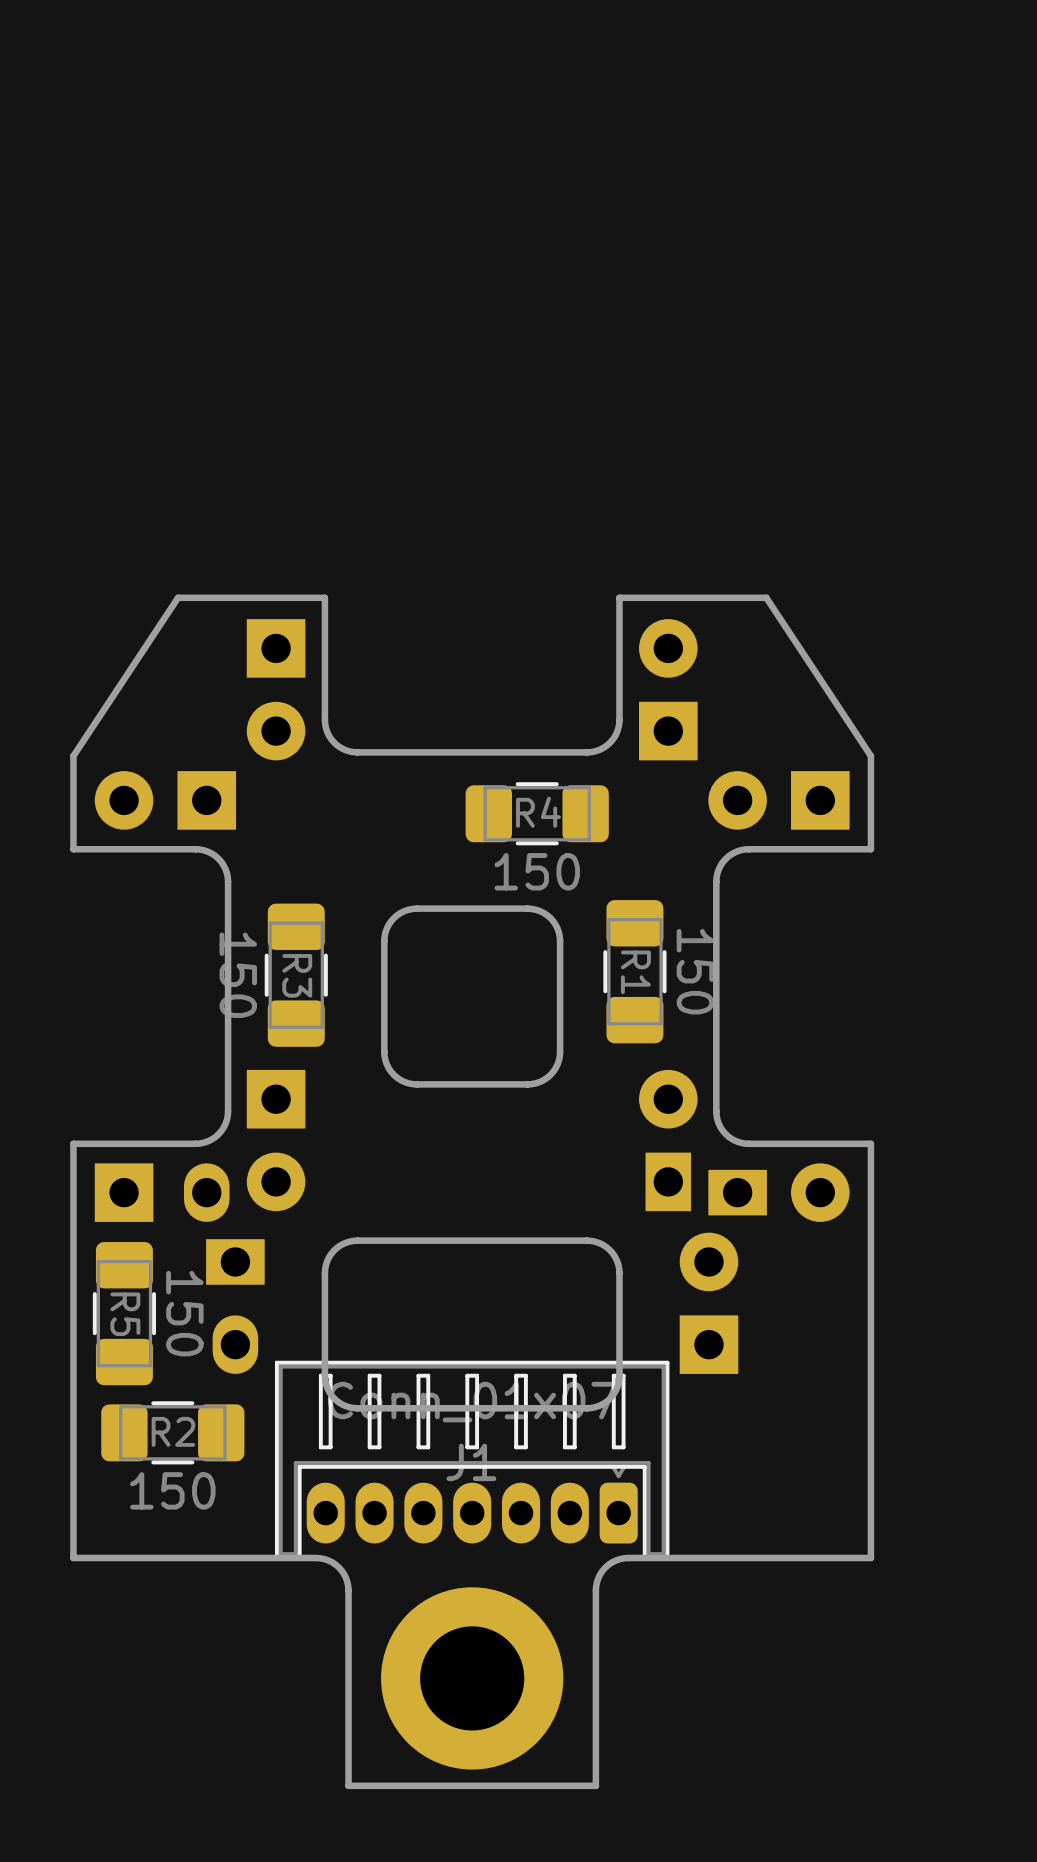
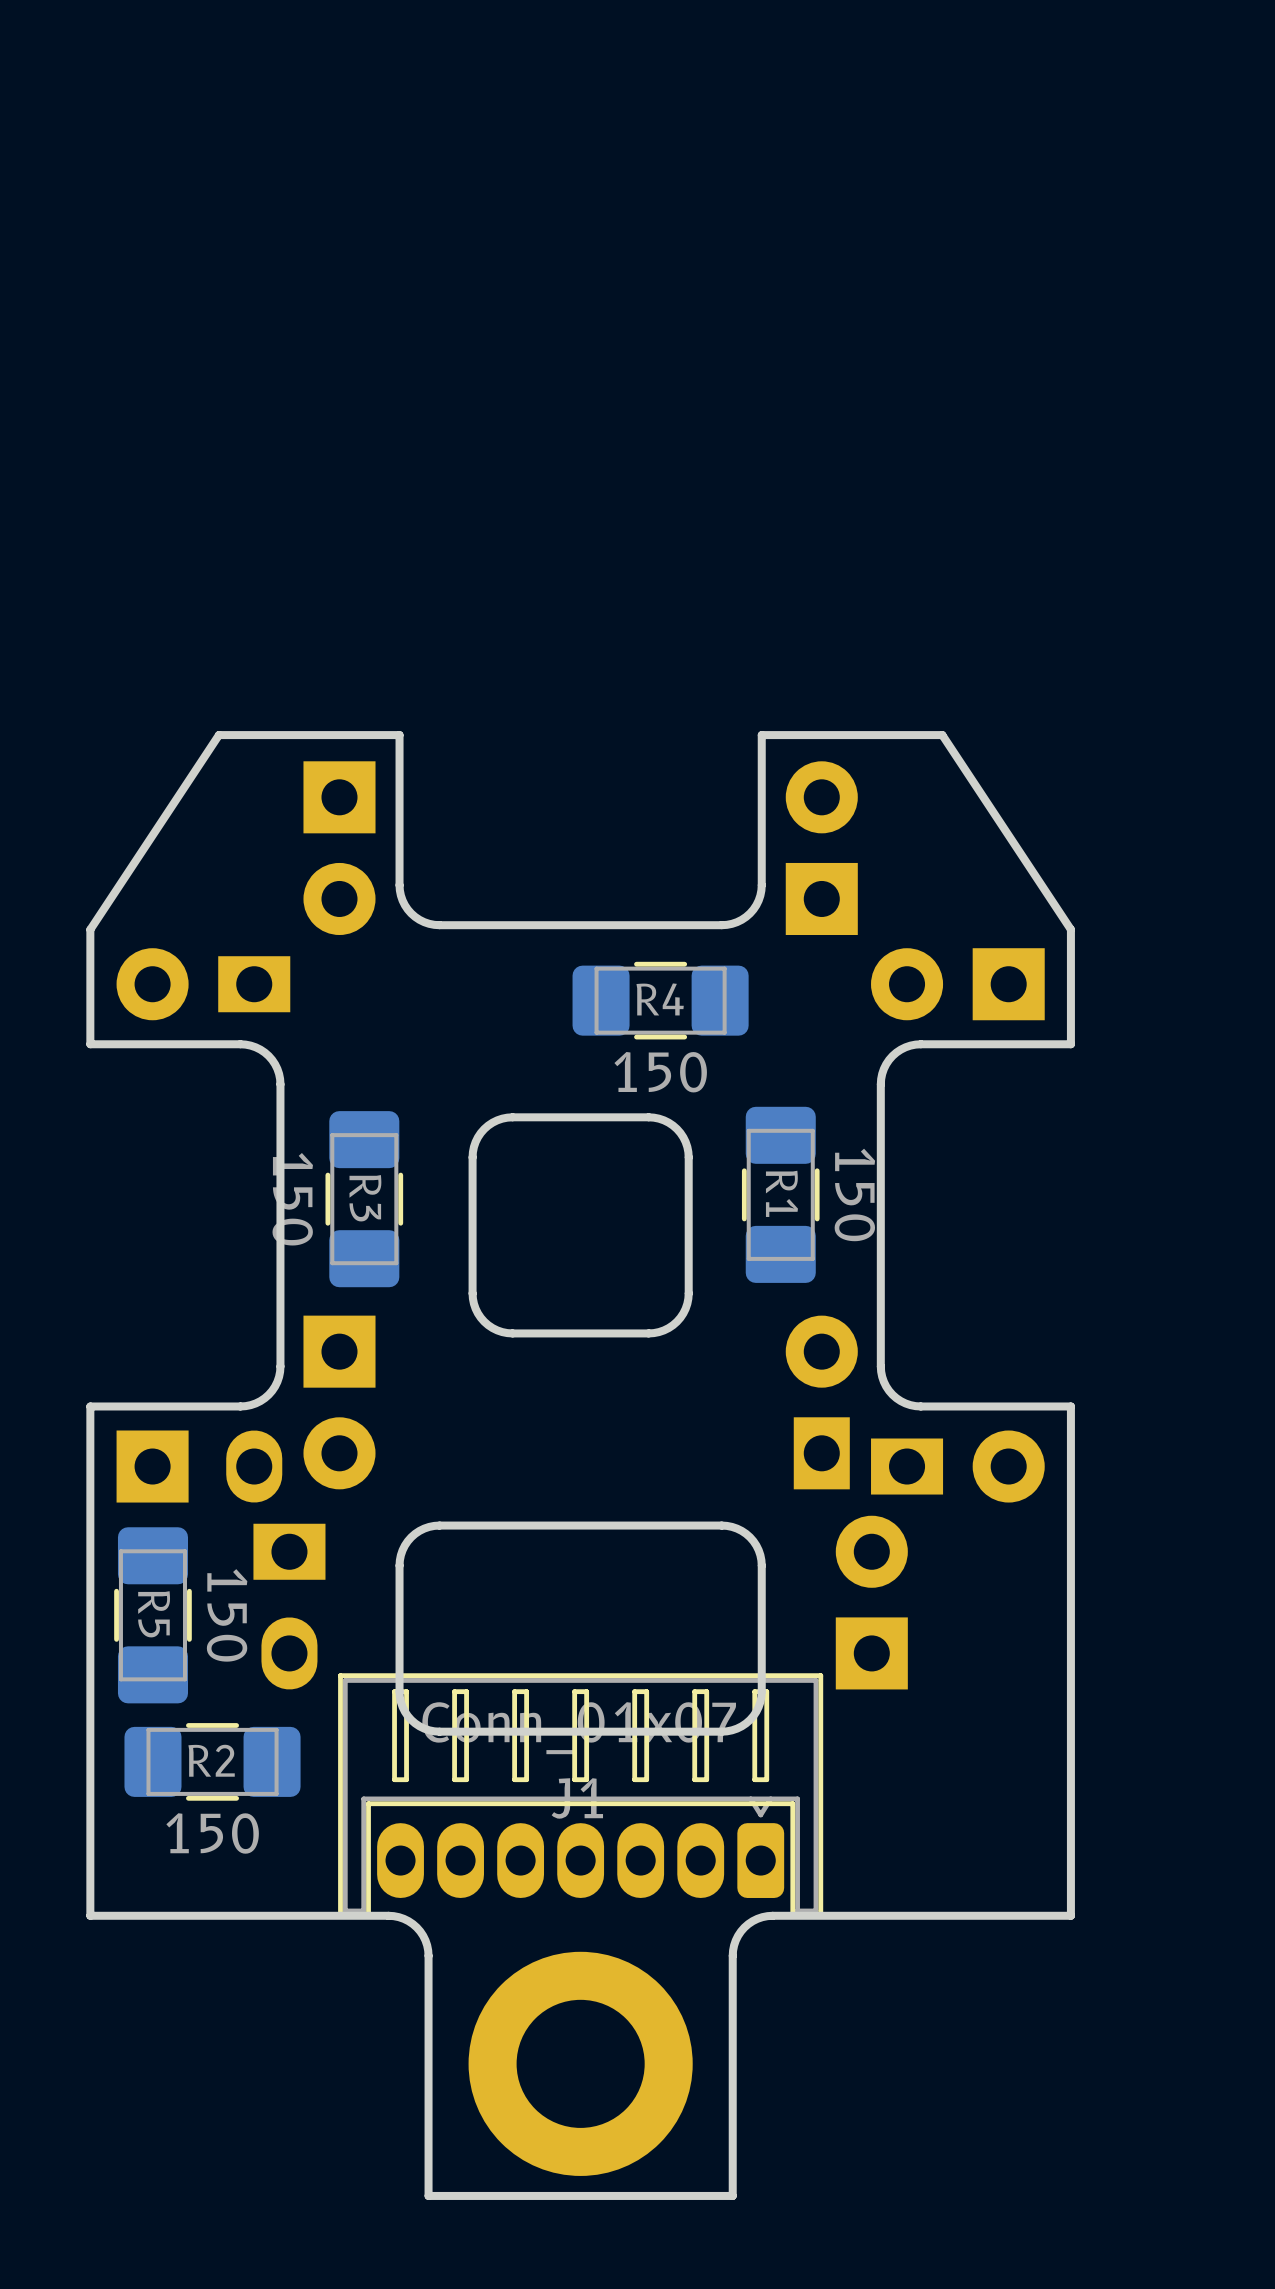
part footprint: [94, 771, 237, 830] -> [116, 948, 291, 1021]

